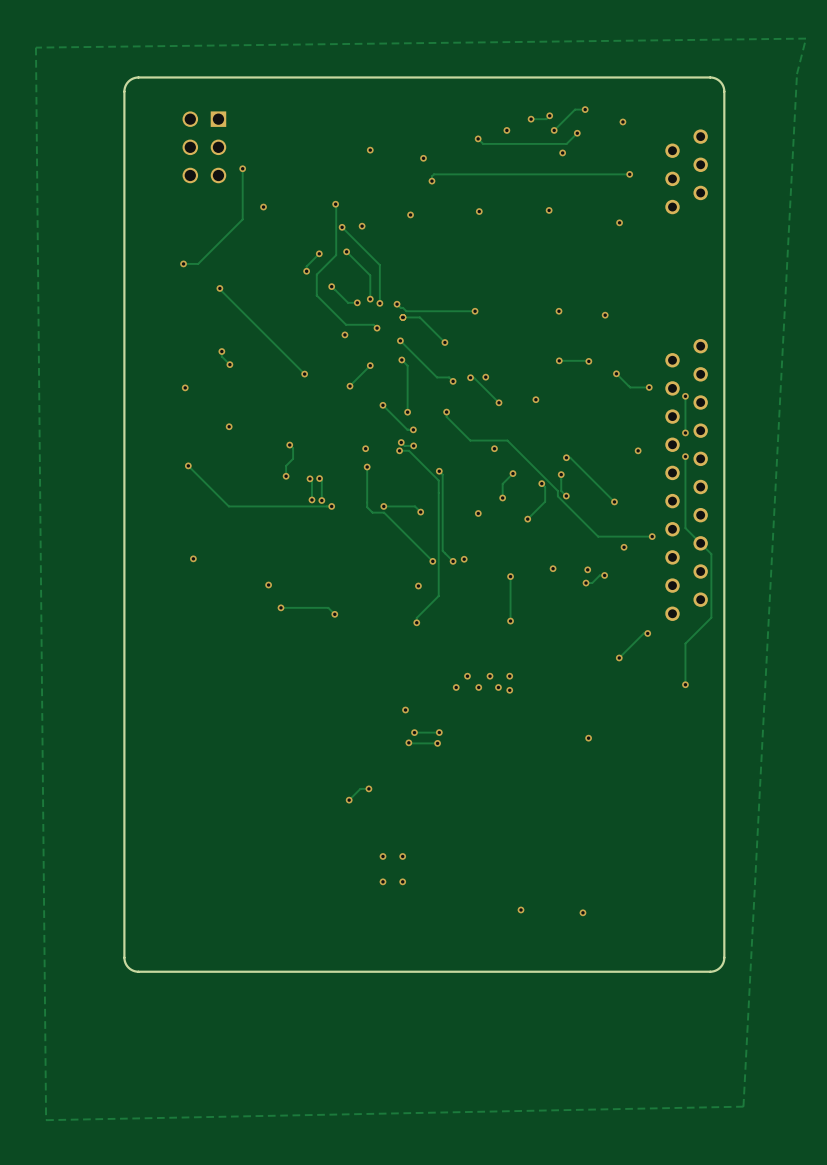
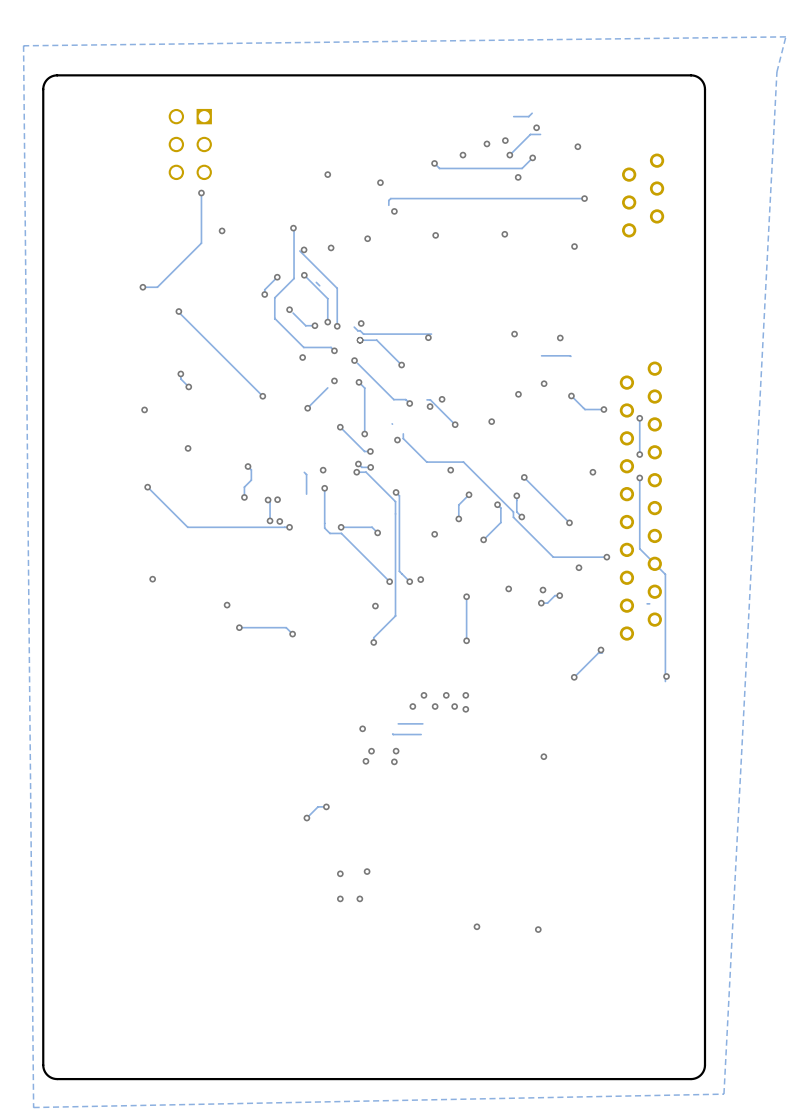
board edge: (138, 77) (128, 81) (124, 91) (124, 957) (126, 964) (131, 969) (138, 971) (710, 971) (720, 967) (724, 957) -> (125, 75) (55, 75) (47, 79) (43, 87) (43, 1065) (45, 1072) (50, 1077) (57, 1079) (692, 1078) (700, 1075) (704, 1066) (705, 946)
track: (585, 109) (575, 109) (554, 130) -> (540, 134) (530, 134) (509, 155)
via: (585, 109) -> none
via: (549, 115) -> none
via: (531, 119) -> none
via: (622, 121) -> none
via: (506, 130) -> none
track: (577, 133) (566, 143) (483, 143) (478, 138) -> (532, 157) (522, 168) (439, 168) (434, 163)
via: (577, 133) -> none
via: (478, 138) -> none
via: none -> (505, 140)
via: none -> (486, 143)
via: none -> (577, 146)
via: (370, 150) -> none
via position: (562, 152) -> (532, 157)
via: (423, 158) -> none
via: none -> (462, 155)
via: none -> (509, 155)
via: none -> (434, 163)
track: (242, 168) (242, 219) (198, 263) (183, 263) -> (201, 193) (201, 243) (157, 287) (142, 287)
via: (242, 168) -> none
part position: (686, 171) -> (643, 195)
track: (629, 174) (433, 174) (431, 181) -> (584, 198) (390, 198) (388, 205)
via: (629, 174) -> none
via: none -> (327, 174)
via: none -> (518, 177)
via: (431, 181) -> none
via: none -> (380, 182)
via: none -> (201, 193)
via: none -> (584, 198)
track: (335, 204) (336, 255) (316, 274) (316, 296) -> (293, 228) (294, 278) (274, 297) (274, 319)
via: (335, 204) -> none
via: (263, 207) -> none
via: (549, 210) -> none
via: (479, 211) -> none
via: (619, 222) -> none
via: (362, 226) -> none
track: (342, 227) (379, 265) (379, 303) -> (299, 251) (337, 288) (337, 326)
via: (342, 227) -> none
via: none -> (293, 228)
via: none -> (222, 230)
via: none -> (504, 234)
via: none -> (435, 235)
via: none -> (367, 238)
via: none -> (574, 246)
track: (346, 251) (370, 275) (370, 299) -> (304, 275) (327, 298) (327, 322)
track: (319, 253) (306, 266) (306, 271) -> (277, 277) (264, 289) (264, 294)
via: (183, 263) -> none
via: (306, 271) -> none
via: none -> (304, 275)
via: none -> (277, 277)
via: (331, 286) -> none
track: (219, 288) (304, 374) -> (178, 311) (262, 396)
via: (219, 288) -> none
track: (335, 290) (348, 302) (357, 302) -> (293, 313) (305, 325) (314, 325)
via: none -> (142, 287)
track: (316, 295) (346, 324) (373, 324) (377, 328) -> (274, 318) (303, 347) (331, 347) (334, 350)
via: none -> (264, 294)
via: (370, 299) -> none
via: (357, 302) -> none
via: (379, 303) -> none
track: (397, 304) (406, 311) (475, 311) -> (354, 327) (363, 334) (431, 334)
via: (397, 304) -> none
via: (475, 311) -> none
via: (558, 311) -> none
via: none -> (289, 309)
via: (605, 315) -> none
via: none -> (178, 311)
track: (402, 317) (419, 317) (444, 342) -> (360, 340) (376, 340) (401, 365)
via: (402, 317) -> none
via: none -> (327, 322)
via: none -> (314, 325)
via: none -> (337, 326)
via: (344, 334) -> none
via: none -> (514, 334)
track: (400, 340) (437, 377) (449, 377) (453, 381) -> (357, 363) (393, 399) (405, 399) (409, 403)
via: (400, 340) -> none
via: none -> (560, 337)
via: none -> (360, 340)
track: (221, 351) (221, 356) (229, 364) -> (180, 373) (180, 378) (188, 386)
via: (221, 351) -> none
via: none -> (334, 350)
track: (401, 359) (407, 365) (407, 412) -> (358, 382) (364, 388) (364, 434)
via: (401, 359) -> none
via: (559, 360) -> none
via: (588, 361) -> none
via: (229, 364) -> none
track: (370, 365) (350, 386) -> (327, 387) (307, 408)
via: none -> (401, 365)
track: (616, 373) (630, 387) (649, 387) -> (571, 395) (584, 409) (603, 409)
via: (616, 373) -> none
via position: (304, 374) -> (302, 357)
track: (470, 377) (473, 377) (499, 402) -> (427, 399) (430, 399) (455, 424)
via: (470, 377) -> none
via: (485, 377) -> none
via: none -> (180, 373)
via: (453, 381) -> none
via: (185, 387) -> none
via: none -> (358, 382)
via: (649, 387) -> none
via: none -> (544, 383)
via: none -> (188, 386)
track: (685, 396) (685, 432) -> (639, 418) (639, 454)
via: (685, 396) -> none
via: none -> (262, 396)
via: none -> (571, 395)
via: (499, 402) -> none
via: none -> (442, 399)
track: (382, 405) (407, 429) (413, 429) -> (340, 427) (364, 451) (370, 451)
via: (382, 405) -> none
via: none -> (409, 403)
via: (407, 412) -> none
track: (446, 412) (446, 416) (470, 440) (507, 440) (557, 490) (557, 496) (598, 536) (652, 536) -> (403, 433) (403, 438) (426, 462) (463, 462) (513, 511) (513, 517) (553, 557) (606, 557)
via: none -> (307, 408)
via: none -> (144, 409)
via: none -> (603, 409)
via: none -> (639, 418)
via: (229, 426) -> none
via: none -> (491, 421)
via: (413, 429) -> none
via: none -> (455, 424)
via: none -> (340, 427)
via: (685, 432) -> none
via: none -> (364, 434)
track: (401, 442) (404, 445) (413, 445) -> (358, 464) (361, 467) (370, 467)
via: (401, 442) -> none
track: (289, 445) (293, 448) (293, 458) (286, 465) (286, 476) -> (248, 466) (251, 469) (251, 480) (244, 487) (244, 497)
via: (289, 445) -> none
via: (365, 448) -> none
via: (494, 448) -> none
track: (399, 450) (408, 450) (438, 480) (438, 596) (416, 617) (416, 622) -> (356, 472) (366, 472) (395, 501) (395, 615) (373, 637) (373, 642)
via: (399, 450) -> none
via: (638, 450) -> none
track: (685, 456) (685, 528) (711, 554) (711, 617) (685, 643) (685, 684) -> none
via: (685, 456) -> none
via: none -> (370, 451)
track: (566, 457) (570, 457) (614, 501) -> (521, 479) (525, 479) (569, 522)
via: (566, 457) -> none
via: none -> (639, 454)
track: (188, 465) (228, 506) (331, 506) -> (147, 487) (187, 527) (289, 527)
via position: (188, 465) -> (188, 448)
track: (367, 467) (367, 507) (372, 512) (384, 512) (432, 561) -> (324, 488) (324, 528) (330, 533) (341, 533) (389, 581)
via: (367, 467) -> none
via: none -> (358, 464)
track: (439, 471) (442, 474) (442, 550) (453, 561) -> (396, 492) (399, 495) (399, 571) (409, 581)
via: (439, 471) -> none
via: none -> (248, 466)
via: none -> (370, 467)
track: (512, 473) (502, 483) (502, 497) -> (469, 494) (458, 505) (458, 518)
via: (512, 473) -> none
track: (561, 474) (561, 490) (566, 496) -> (516, 495) (516, 511) (521, 516)
via: (561, 474) -> none
via: (286, 476) -> none
via: none -> (323, 470)
via: none -> (450, 470)
track: (310, 478) (311, 480) (311, 499) -> (268, 499) (270, 501) (270, 520)
via: (310, 478) -> none
via: (319, 478) -> none
via: none -> (356, 472)
via: none -> (592, 472)
part position: (686, 479) -> (640, 501)
track: (541, 483) (545, 487) (545, 501) (527, 519) -> (497, 504) (500, 508) (500, 522) (483, 539)
track: none -> (639, 477) (639, 548) (665, 574) (665, 681)
via: none -> (639, 477)
via: none -> (147, 487)
via: none -> (324, 488)
via: (566, 496) -> none
via: (502, 497) -> none
via: none -> (396, 492)
via: (311, 499) -> none
via: (321, 500) -> none
via: none -> (469, 494)
via: (614, 501) -> none
via: none -> (516, 495)
via: none -> (244, 497)
via: none -> (268, 499)
via: none -> (277, 499)
via: (331, 506) -> none
track: (383, 506) (415, 506) (420, 512) -> (341, 527) (372, 527) (377, 532)
via: (383, 506) -> none
via: none -> (497, 504)
via: (420, 512) -> none
via: (478, 513) -> none
via: (527, 519) -> none
via: none -> (521, 516)
via: none -> (458, 518)
via: none -> (270, 520)
via: none -> (279, 521)
via: none -> (569, 522)
via: none -> (289, 527)
via: none -> (341, 527)
via: (652, 536) -> none
via: none -> (377, 532)
via: none -> (434, 534)
via: none -> (483, 539)
via: (624, 547) -> none
via: (193, 558) -> none
via: (464, 559) -> none
via: (432, 561) -> none
via: (453, 561) -> none
via: none -> (606, 557)
via: (553, 568) -> none
via: (587, 569) -> none
via: none -> (578, 567)
track: (604, 575) (599, 575) (592, 583) (586, 583) -> (559, 595) (555, 595) (547, 603) (541, 603)
via: (604, 575) -> none
track: (510, 576) (510, 621) -> (466, 596) (466, 640)
via: (510, 576) -> none
via: (586, 583) -> none
via: (268, 585) -> none
via: none -> (152, 579)
via: (418, 586) -> none
via: none -> (420, 579)
via: none -> (389, 581)
via: none -> (409, 581)
via: none -> (508, 588)
via: none -> (543, 590)
via: none -> (559, 595)
via: none -> (466, 596)
track: (281, 607) (328, 607) (334, 614) -> (239, 627) (286, 627) (292, 634)
via: (281, 607) -> none
via: none -> (541, 603)
via: none -> (227, 605)
via: none -> (375, 606)
via: (334, 614) -> none
via: (510, 621) -> none
via: (416, 622) -> none
track: (647, 633) (643, 633) (619, 657) -> (602, 653) (598, 653) (574, 677)
via: (647, 633) -> none
via: none -> (239, 627)
via: none -> (292, 634)
via: none -> (466, 640)
via: none -> (373, 642)
via: (467, 676) -> none
via: (490, 676) -> none
via: (509, 676) -> none
via: none -> (574, 677)
via: (456, 687) -> none
via: (478, 687) -> none
via: (498, 687) -> none
via: (509, 690) -> none
via: none -> (423, 695)
via: none -> (446, 695)
via: none -> (465, 695)
via: (405, 710) -> none
via: none -> (412, 706)
via: none -> (435, 706)
via: none -> (454, 706)
via: none -> (465, 709)
via: (414, 732) -> none
via: (439, 732) -> none
via: none -> (362, 728)
via: (588, 738) -> none
via: (408, 742) -> none
via: (437, 743) -> none
via: none -> (371, 751)
via: none -> (396, 751)
via: none -> (543, 756)
via: none -> (365, 761)
via: none -> (394, 761)
track: (368, 788) (360, 788) (349, 800) -> (326, 806) (318, 806) (306, 818)
via: (368, 788) -> none
via position: (349, 800) -> (326, 806)
via: none -> (306, 818)
via: (382, 856) -> none
via: (402, 856) -> none
via: (402, 881) -> none
via: none -> (340, 873)
via: none -> (340, 898)
via: none -> (359, 898)
via: (521, 909) -> none
via: (582, 912) -> none
via: none -> (476, 926)
via: none -> (538, 929)

